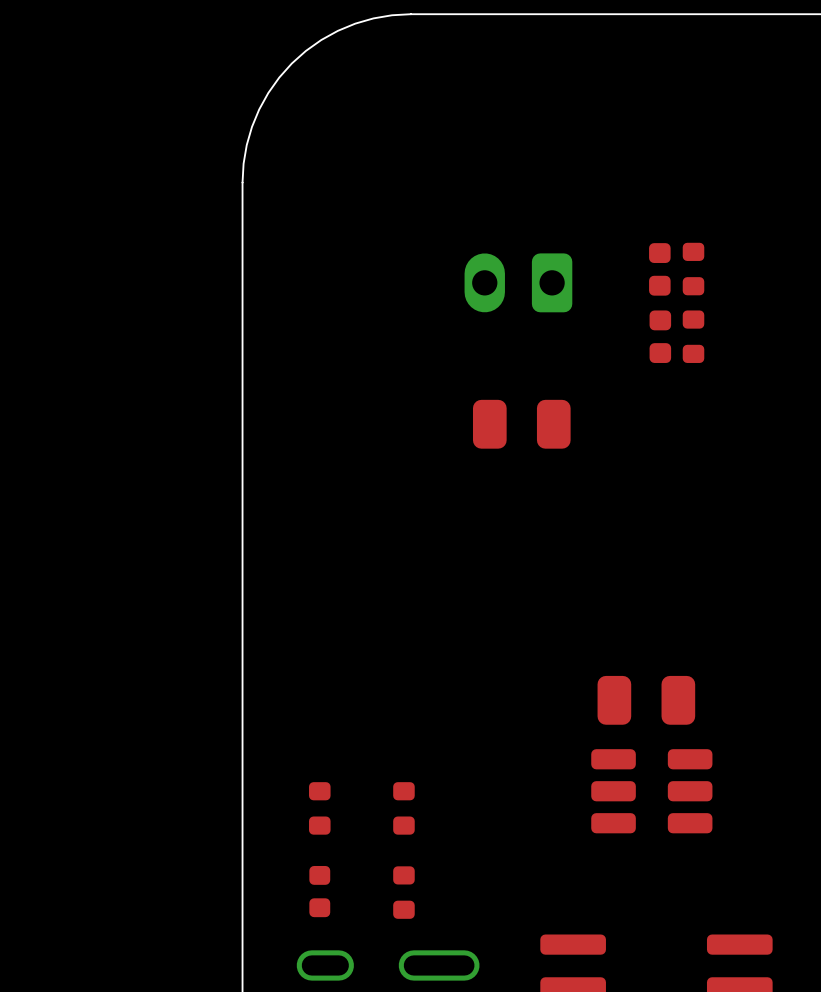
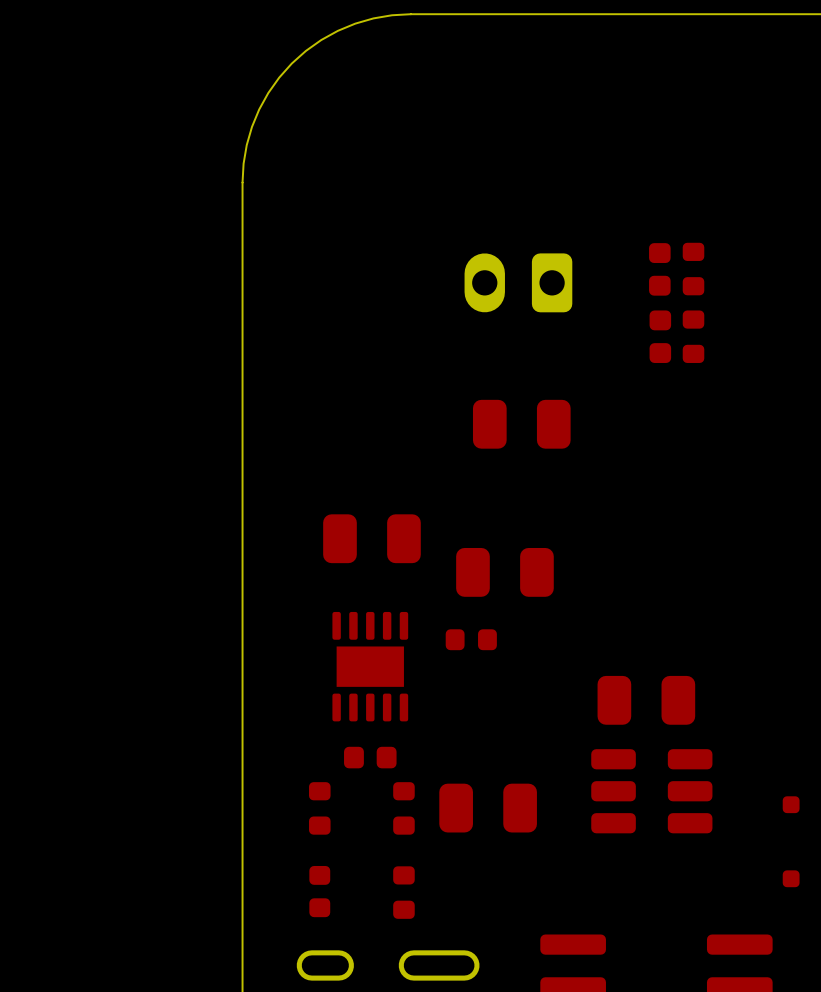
part: none -> (371, 538)
part: none -> (504, 572)
part: none -> (471, 639)
part: none -> (370, 666)
part: none -> (370, 757)
part: none -> (488, 808)
part: none -> (791, 841)

